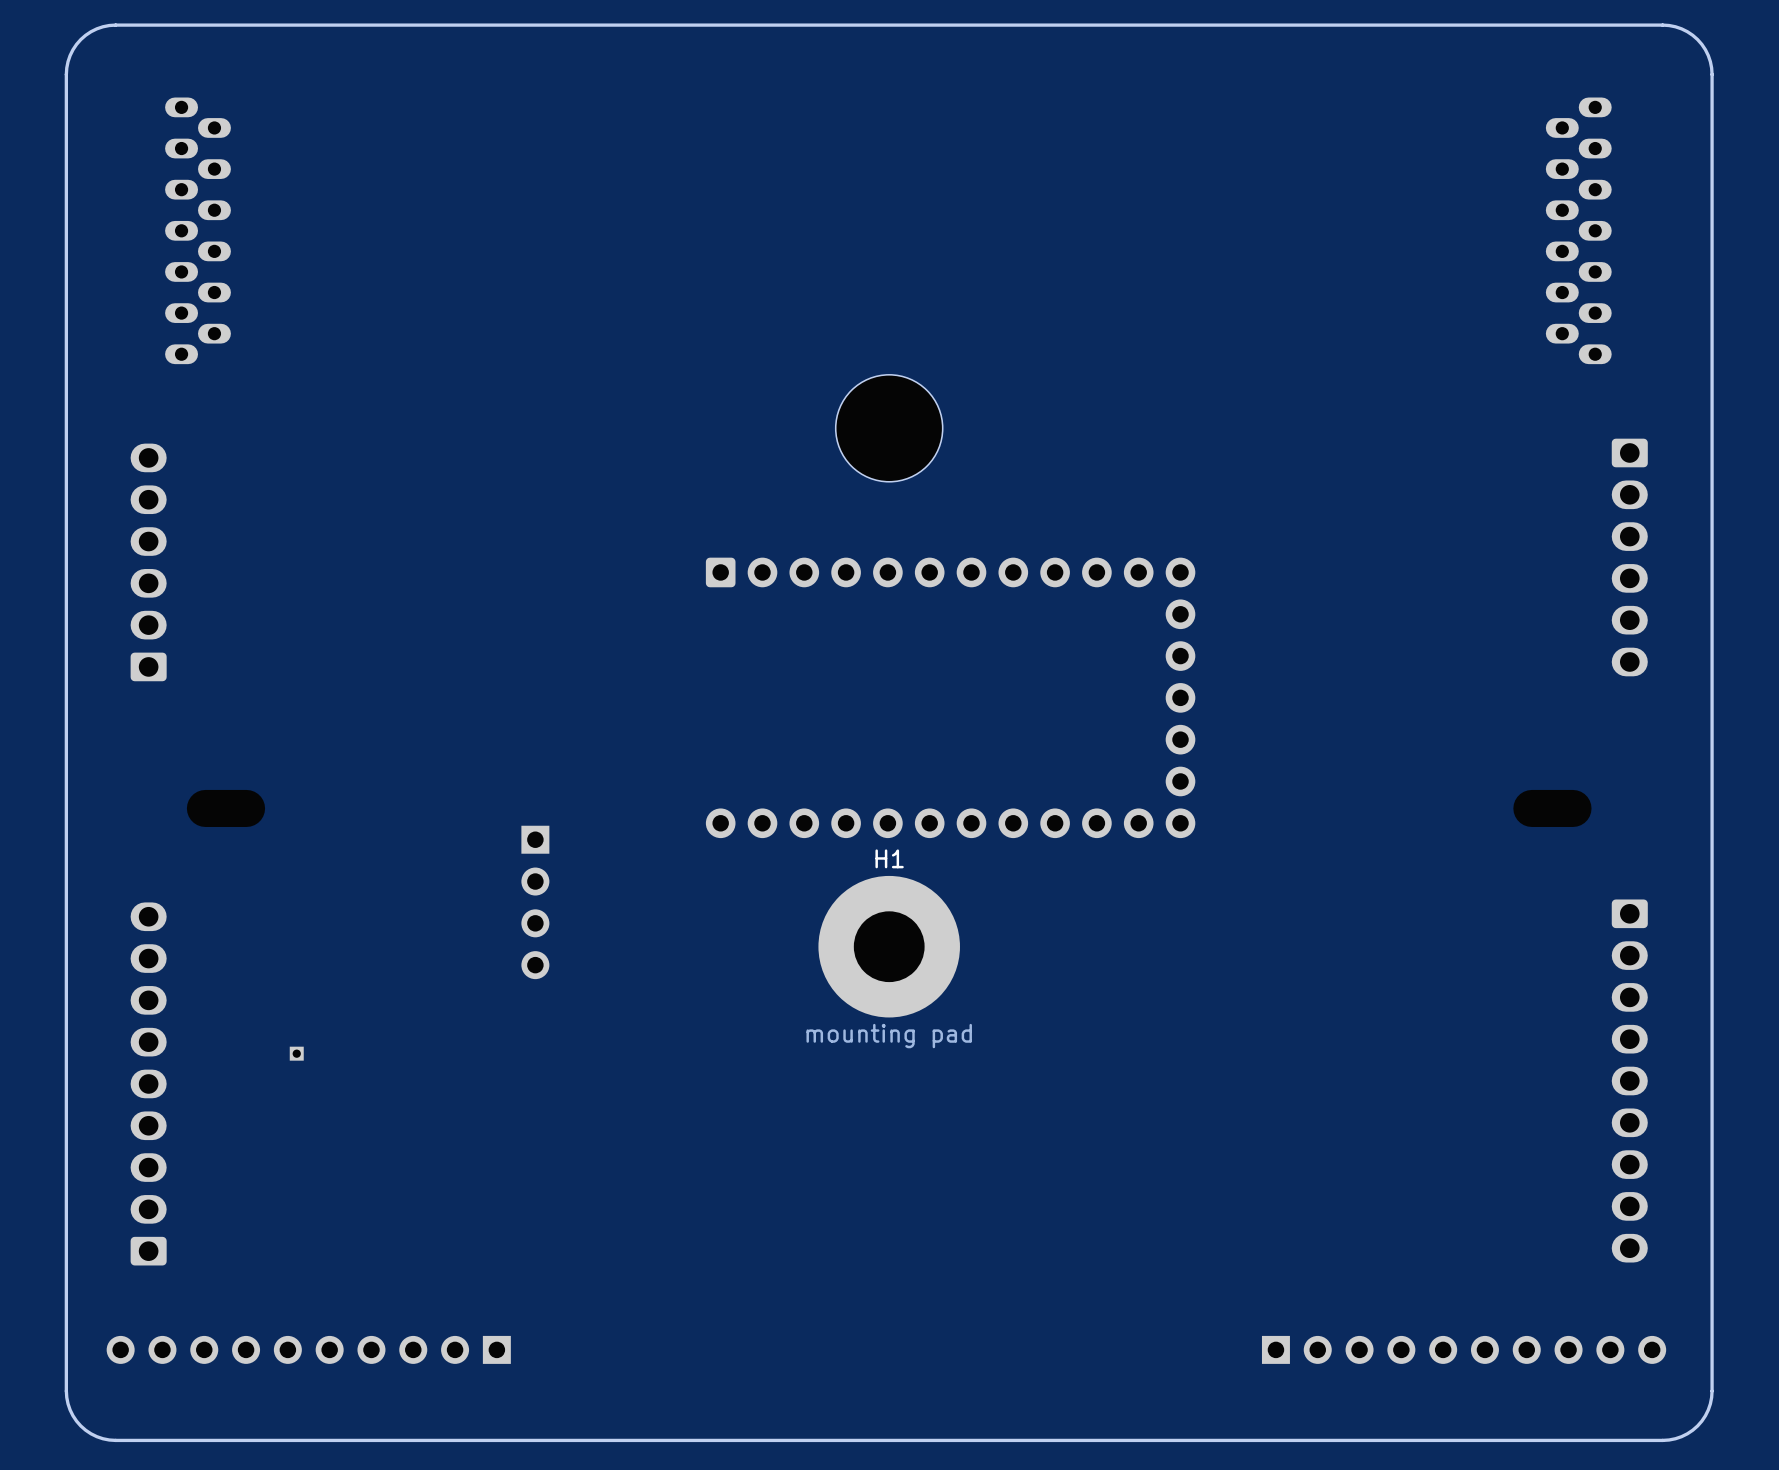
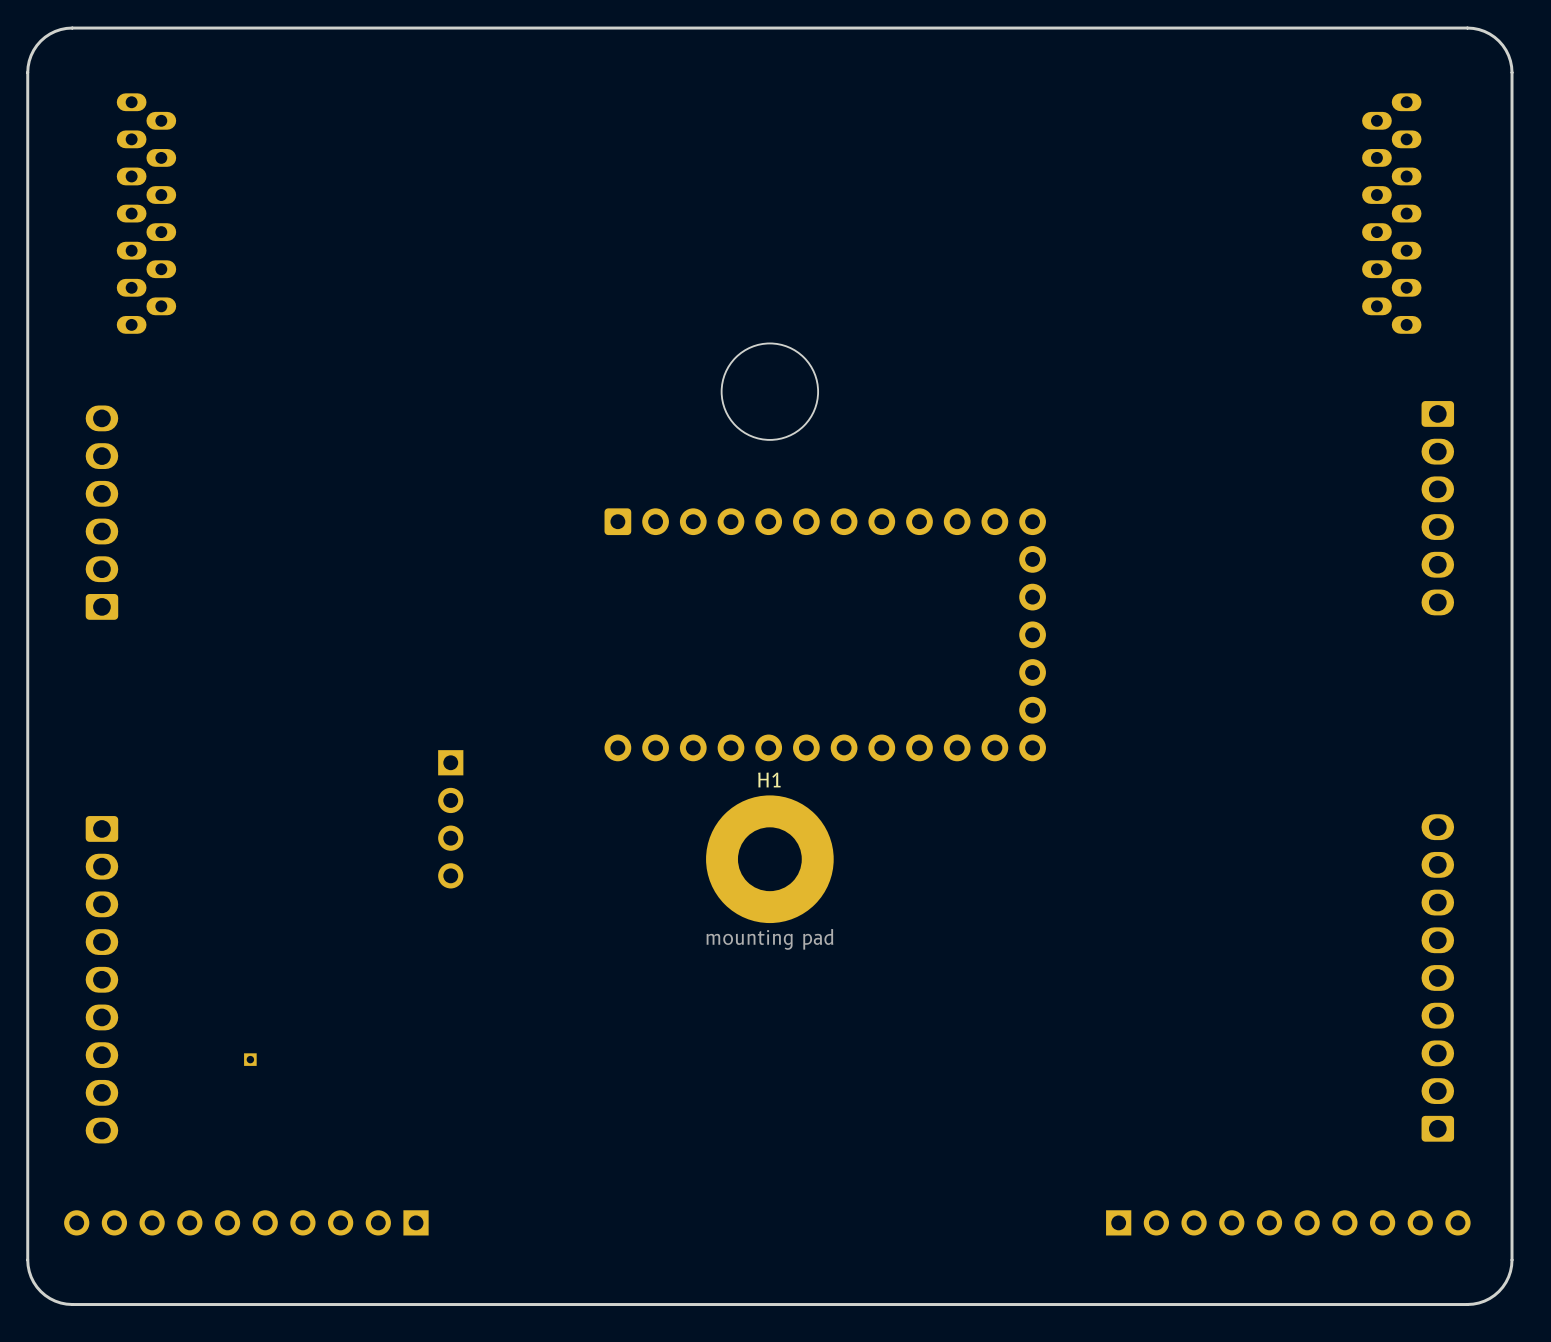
part position: (296, 1053) -> (250, 1059)
part rotation: 0° (1629, 1080) -> 180° (1437, 977)
part rotation: 0° (148, 1083) -> 180° (101, 979)

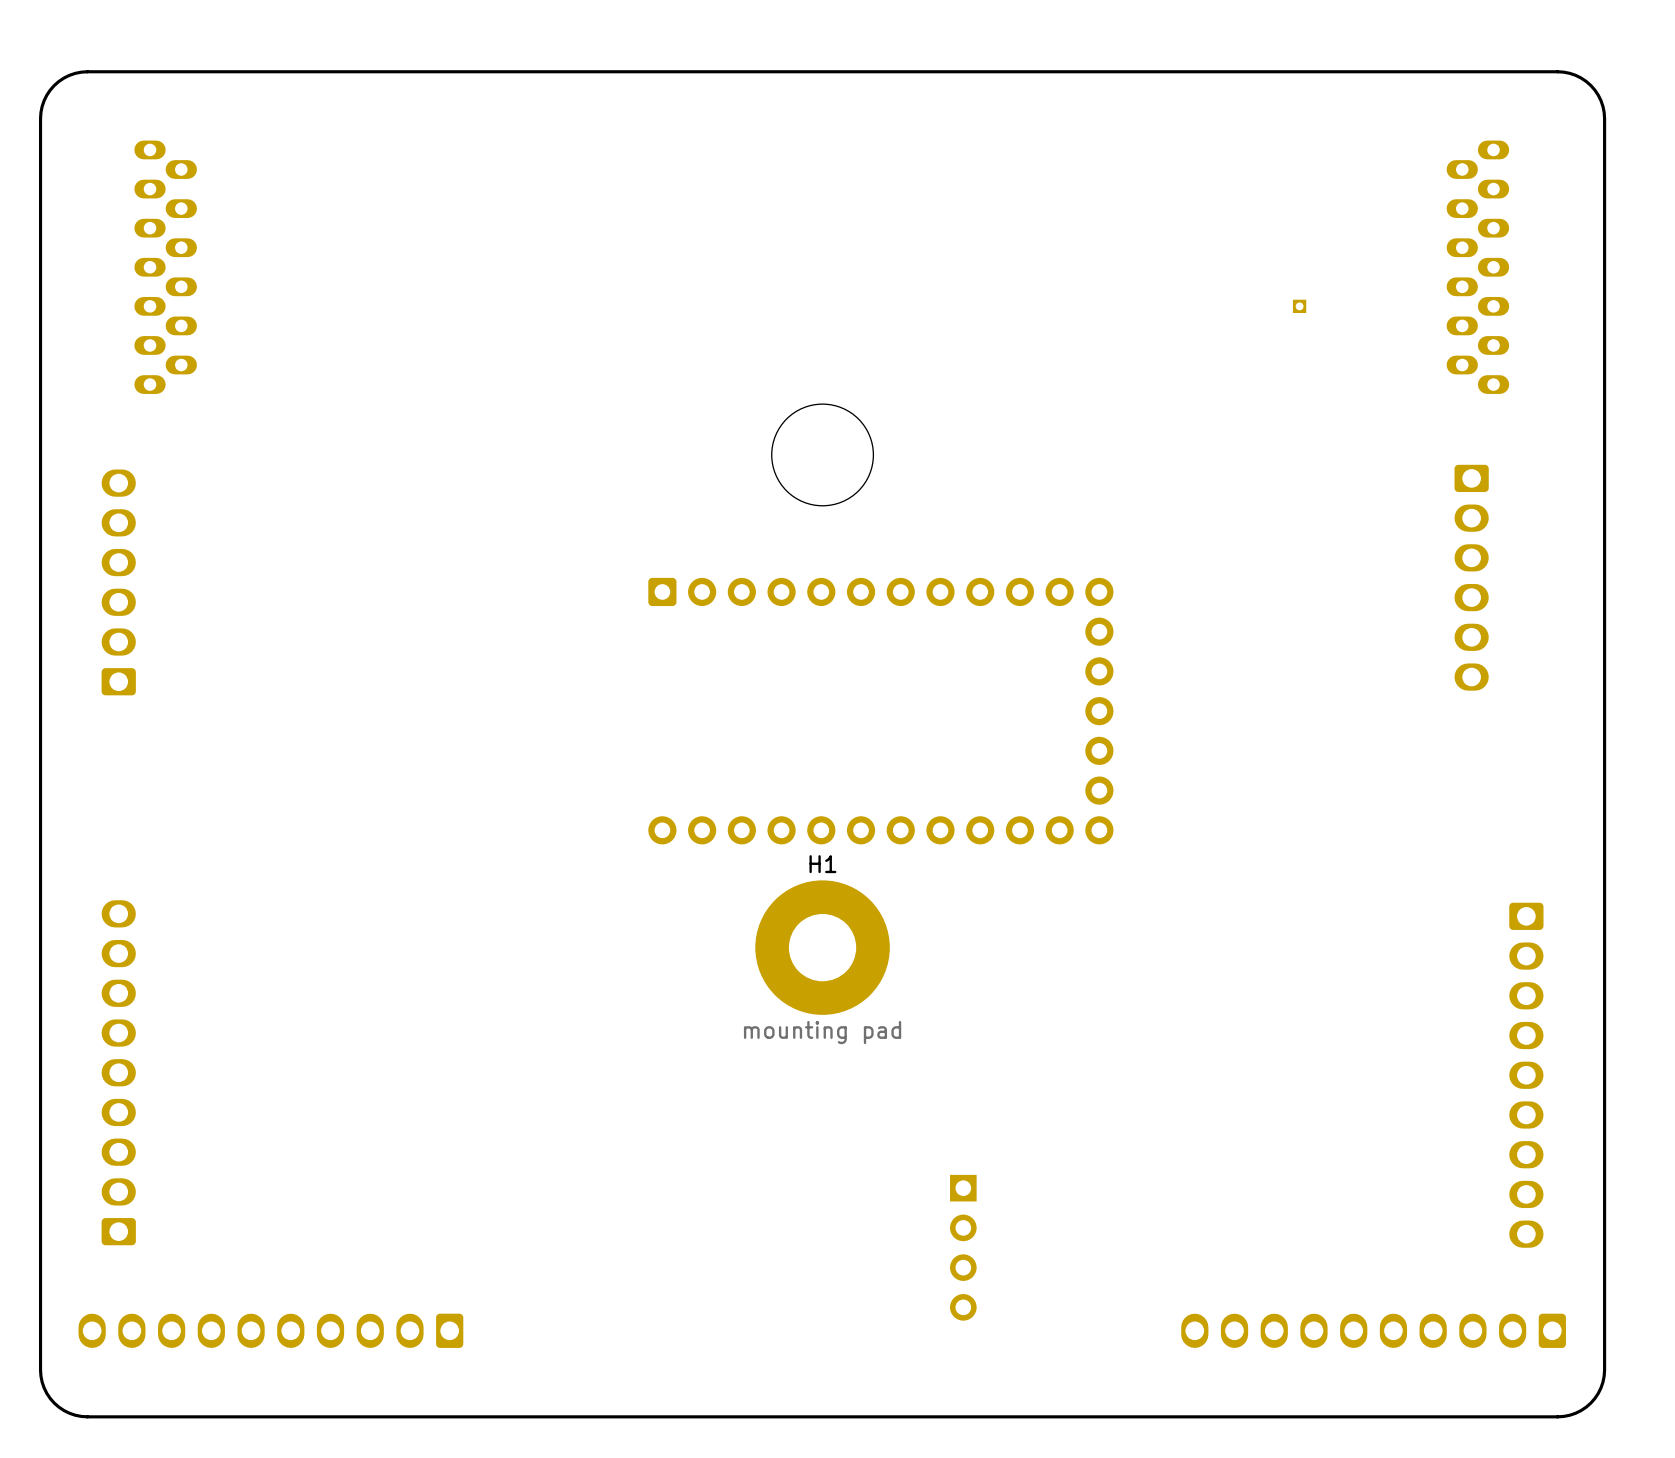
part: none -> (1299, 306)
part position: (1437, 508) -> (1471, 577)
part: (450, 819) -> none
part rotation: 0° (1437, 977) -> 180° (1526, 1075)
part rotation: 0° (101, 979) -> 180° (118, 1072)
part: (250, 1059) -> none
part: none -> (963, 1247)
part footprint: [64, 1210, 429, 1236] -> [78, 1313, 464, 1348]
part footprint: [1106, 1210, 1471, 1236] -> [1181, 1313, 1566, 1348]

